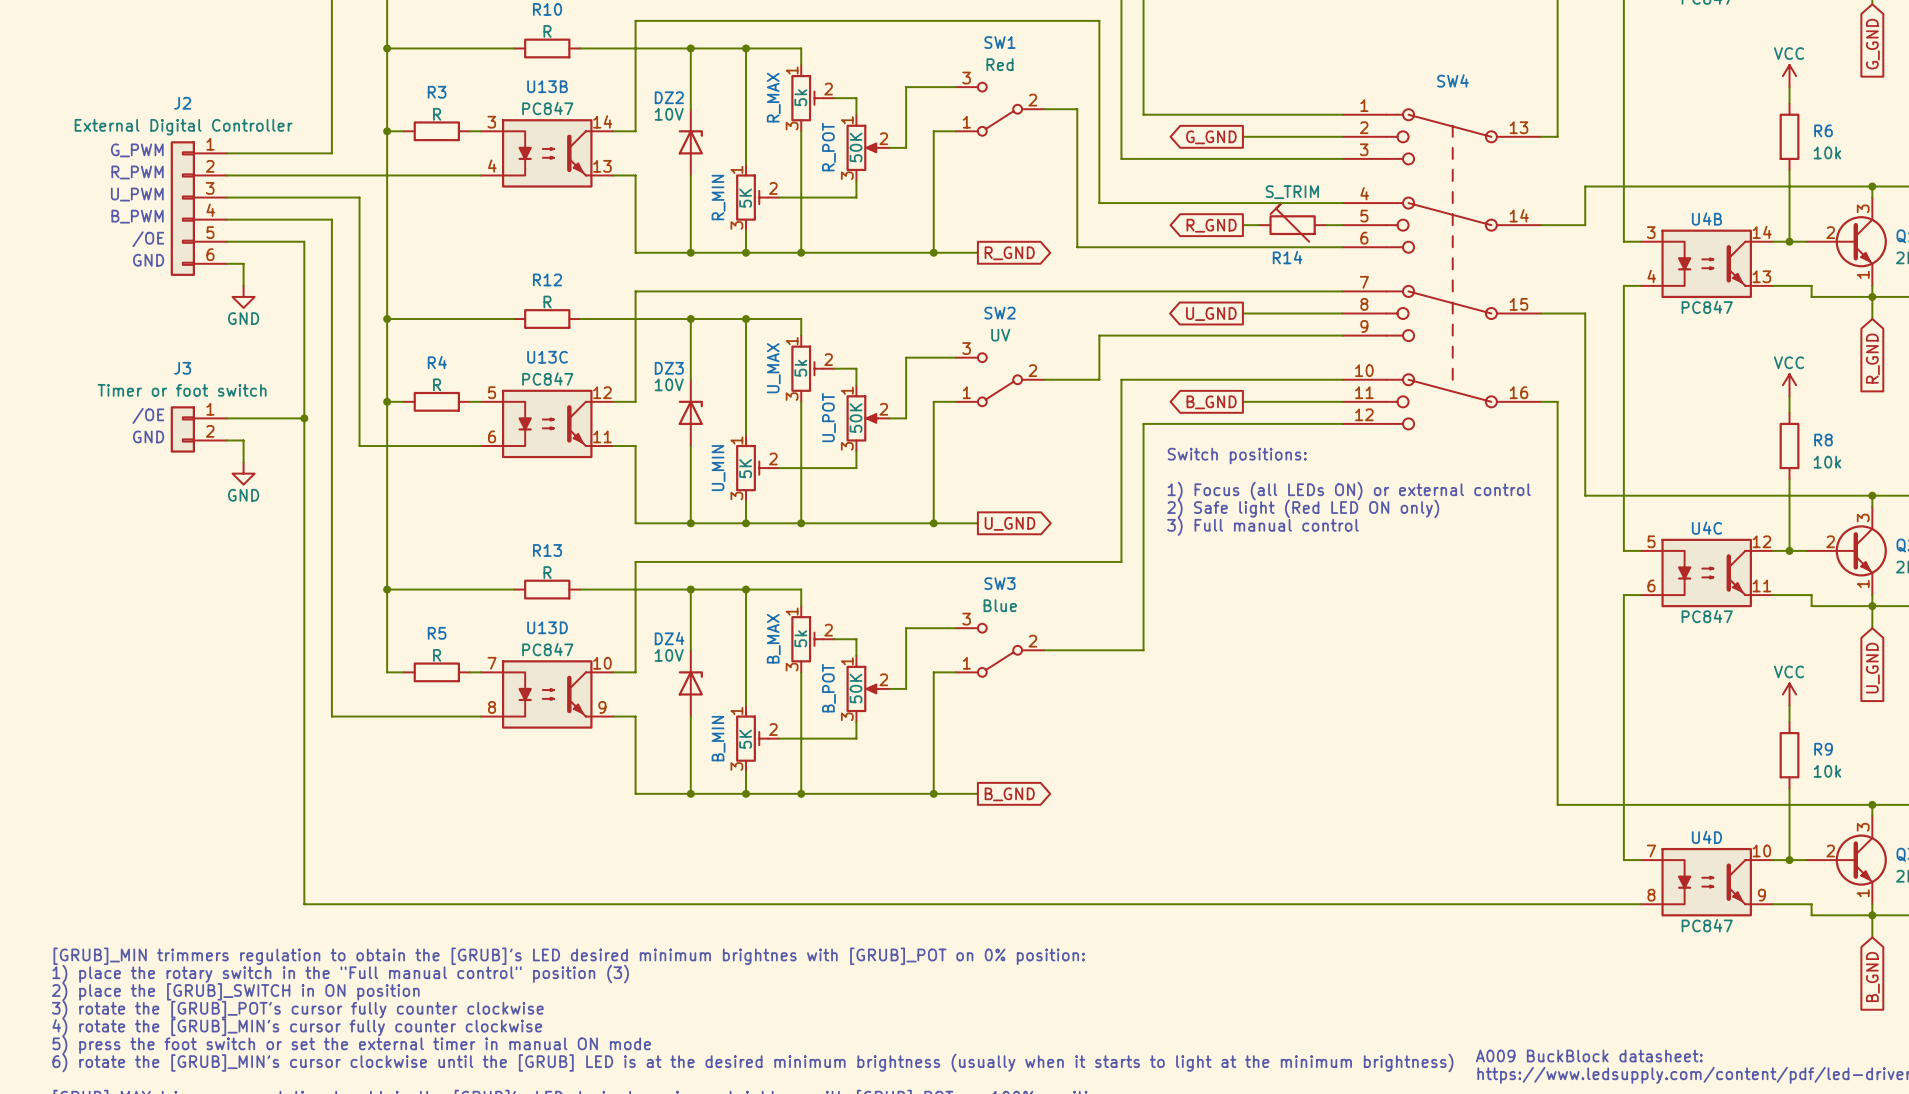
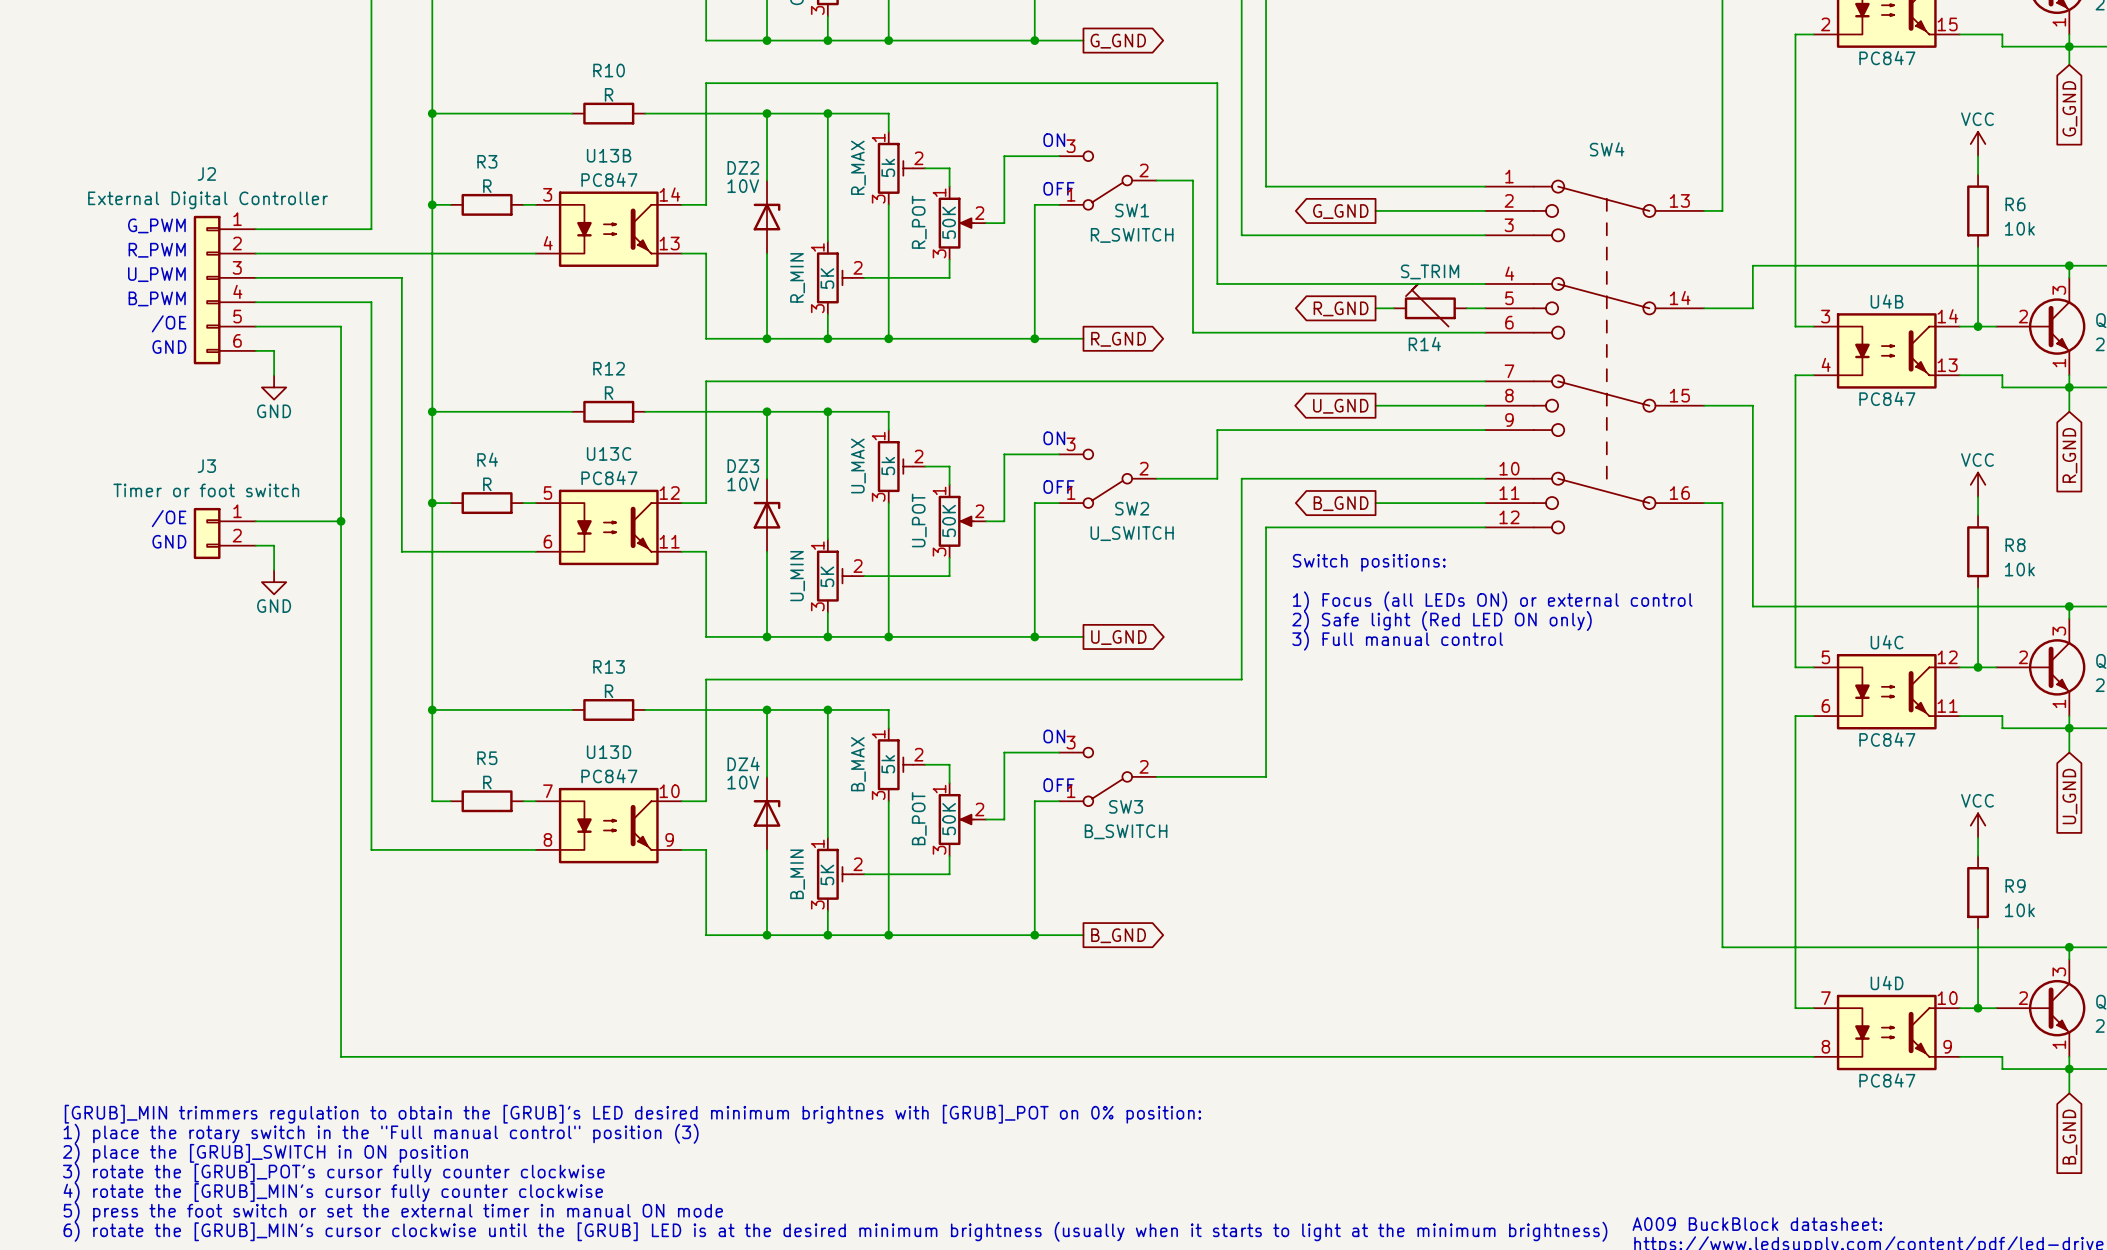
SW1 name position: SW1 (999, 42) -> SW1 (1132, 210)
SW1 value: Red (999, 64) -> R_SWITCH (1132, 235)
text: none -> ON (1054, 140)
text: none -> OFF (1058, 188)
SW2 name position: SW2 (999, 313) -> SW2 (1132, 508)
SW2 value: UV (1000, 335) -> U_SWITCH (1132, 533)
text: none -> ON (1054, 438)
text: none -> OFF (1058, 487)
SW3 name position: SW3 (999, 583) -> SW3 (1126, 806)
SW3 value: Blue (1000, 605) -> B_SWITCH (1126, 831)
text: none -> ON (1054, 736)
text: none -> OFF (1058, 785)

